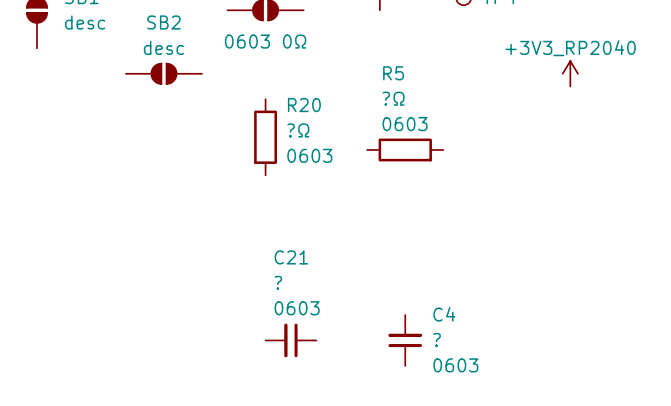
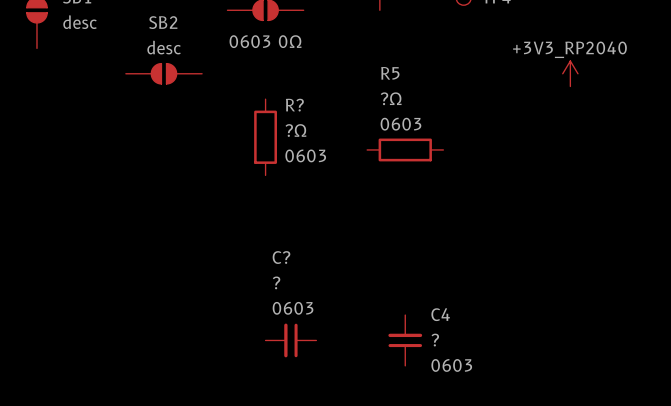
R20 name: R20 (304, 105) -> R? (294, 105)
C21 name: C21 (291, 257) -> C? (281, 257)

